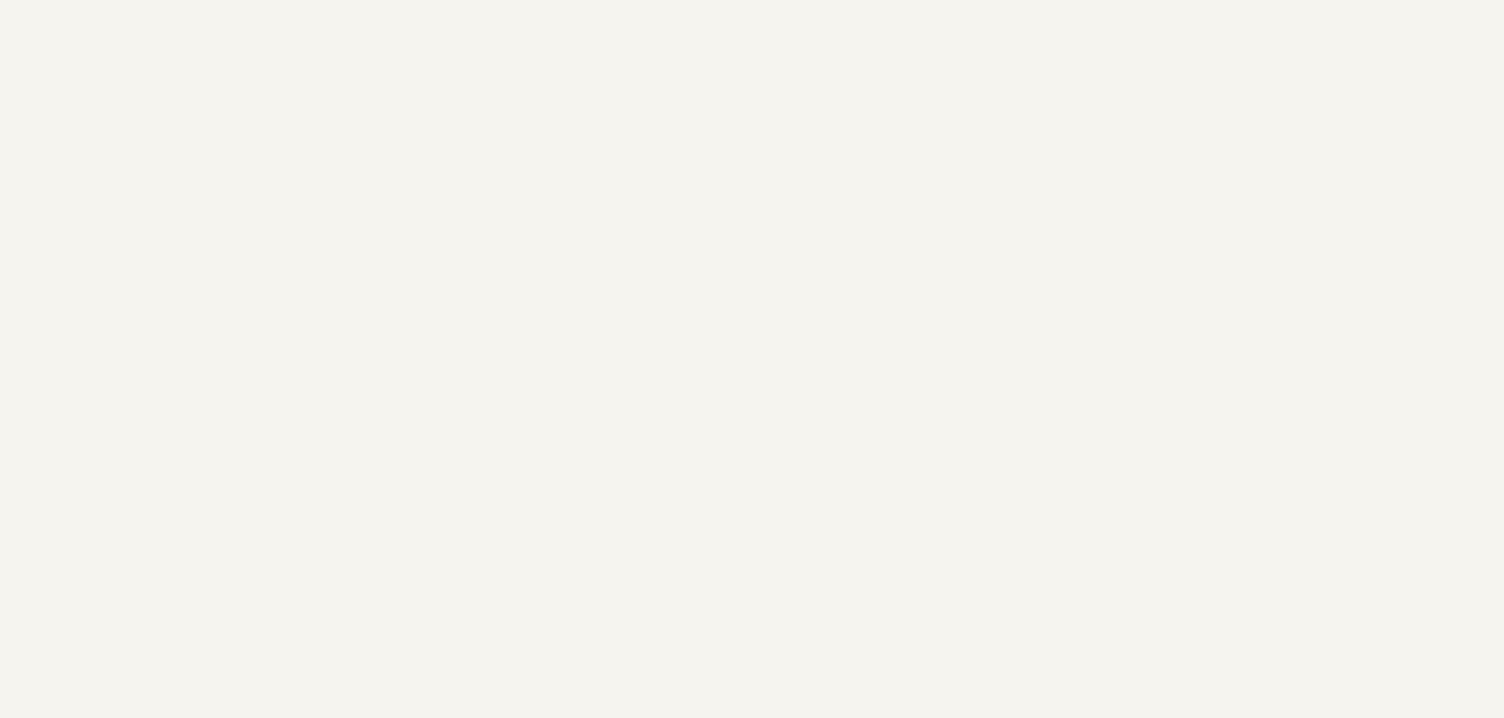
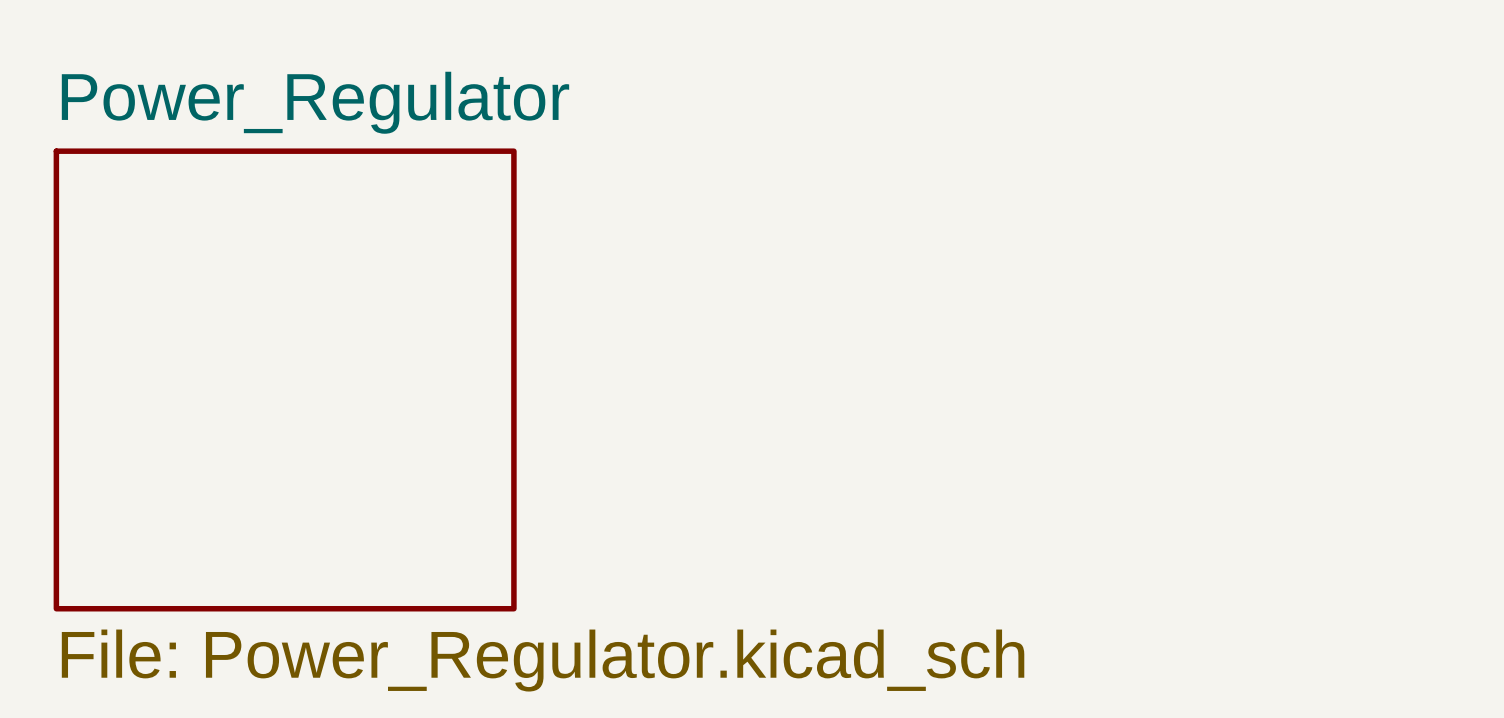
sheet Power_Regulator: none -> File: Power_Regulator.kicad_sch (285, 379)

